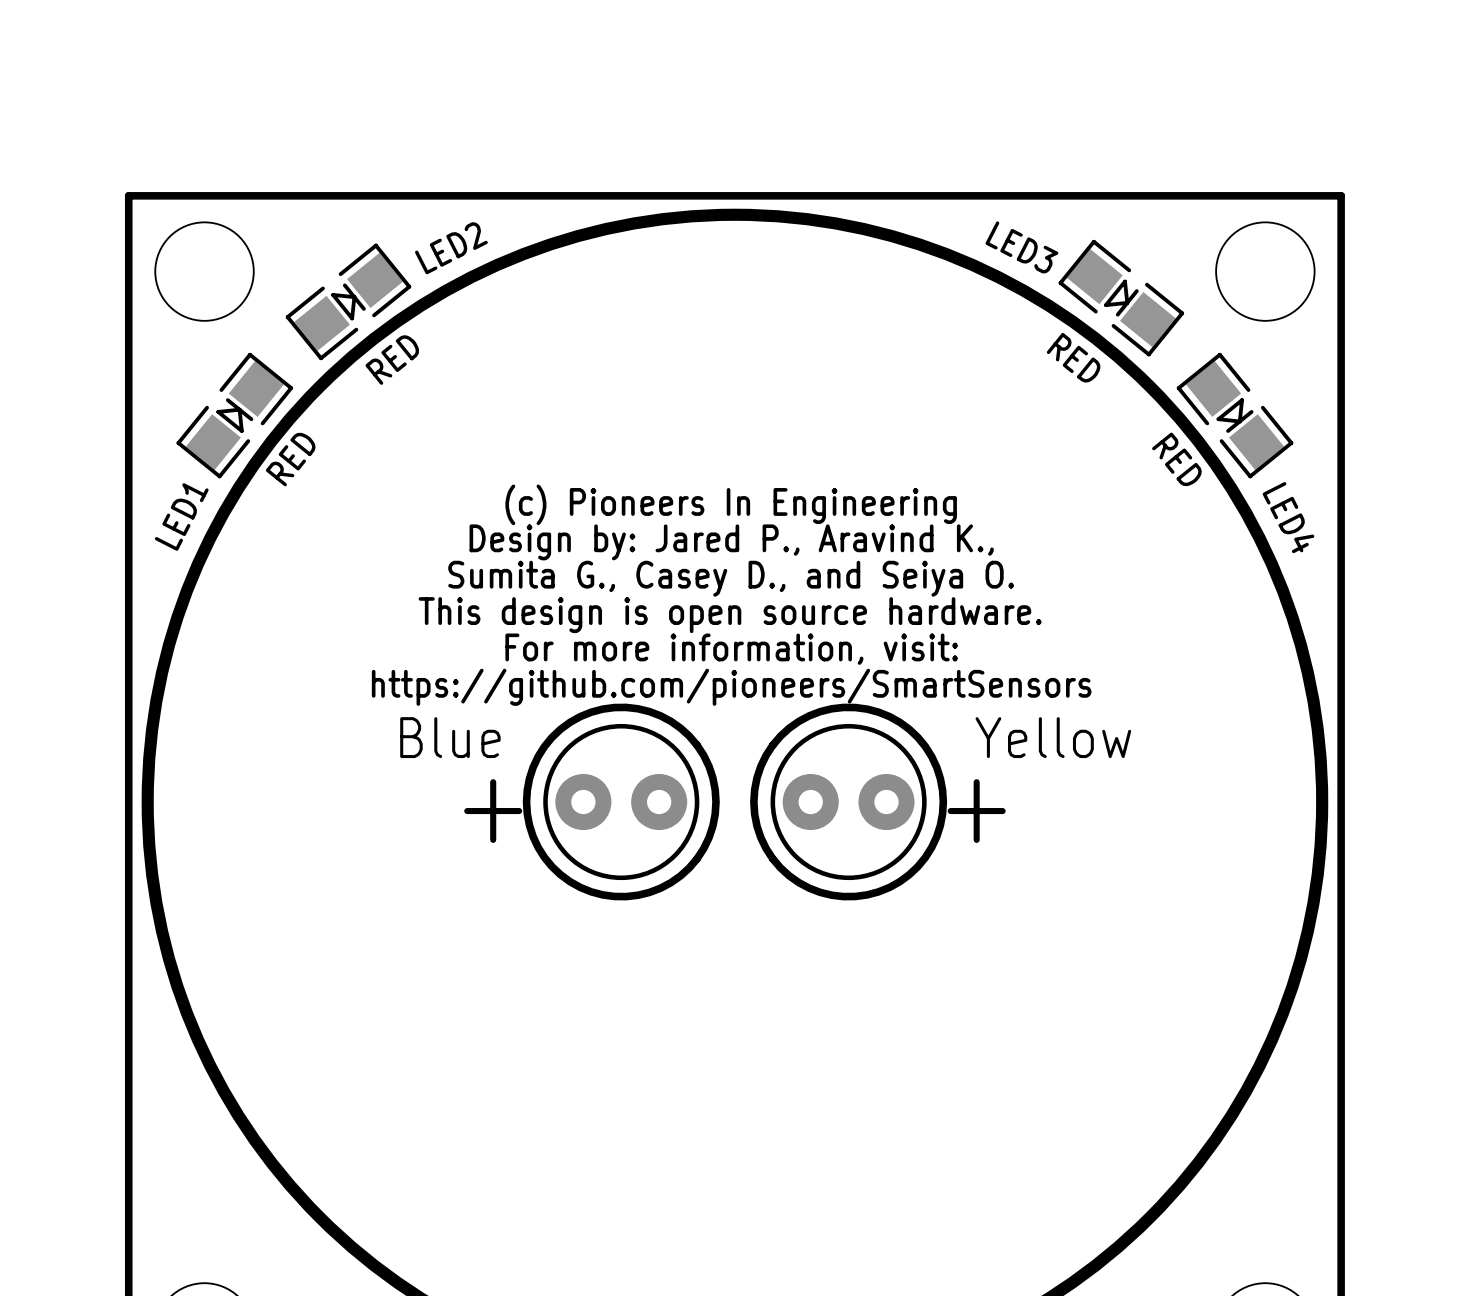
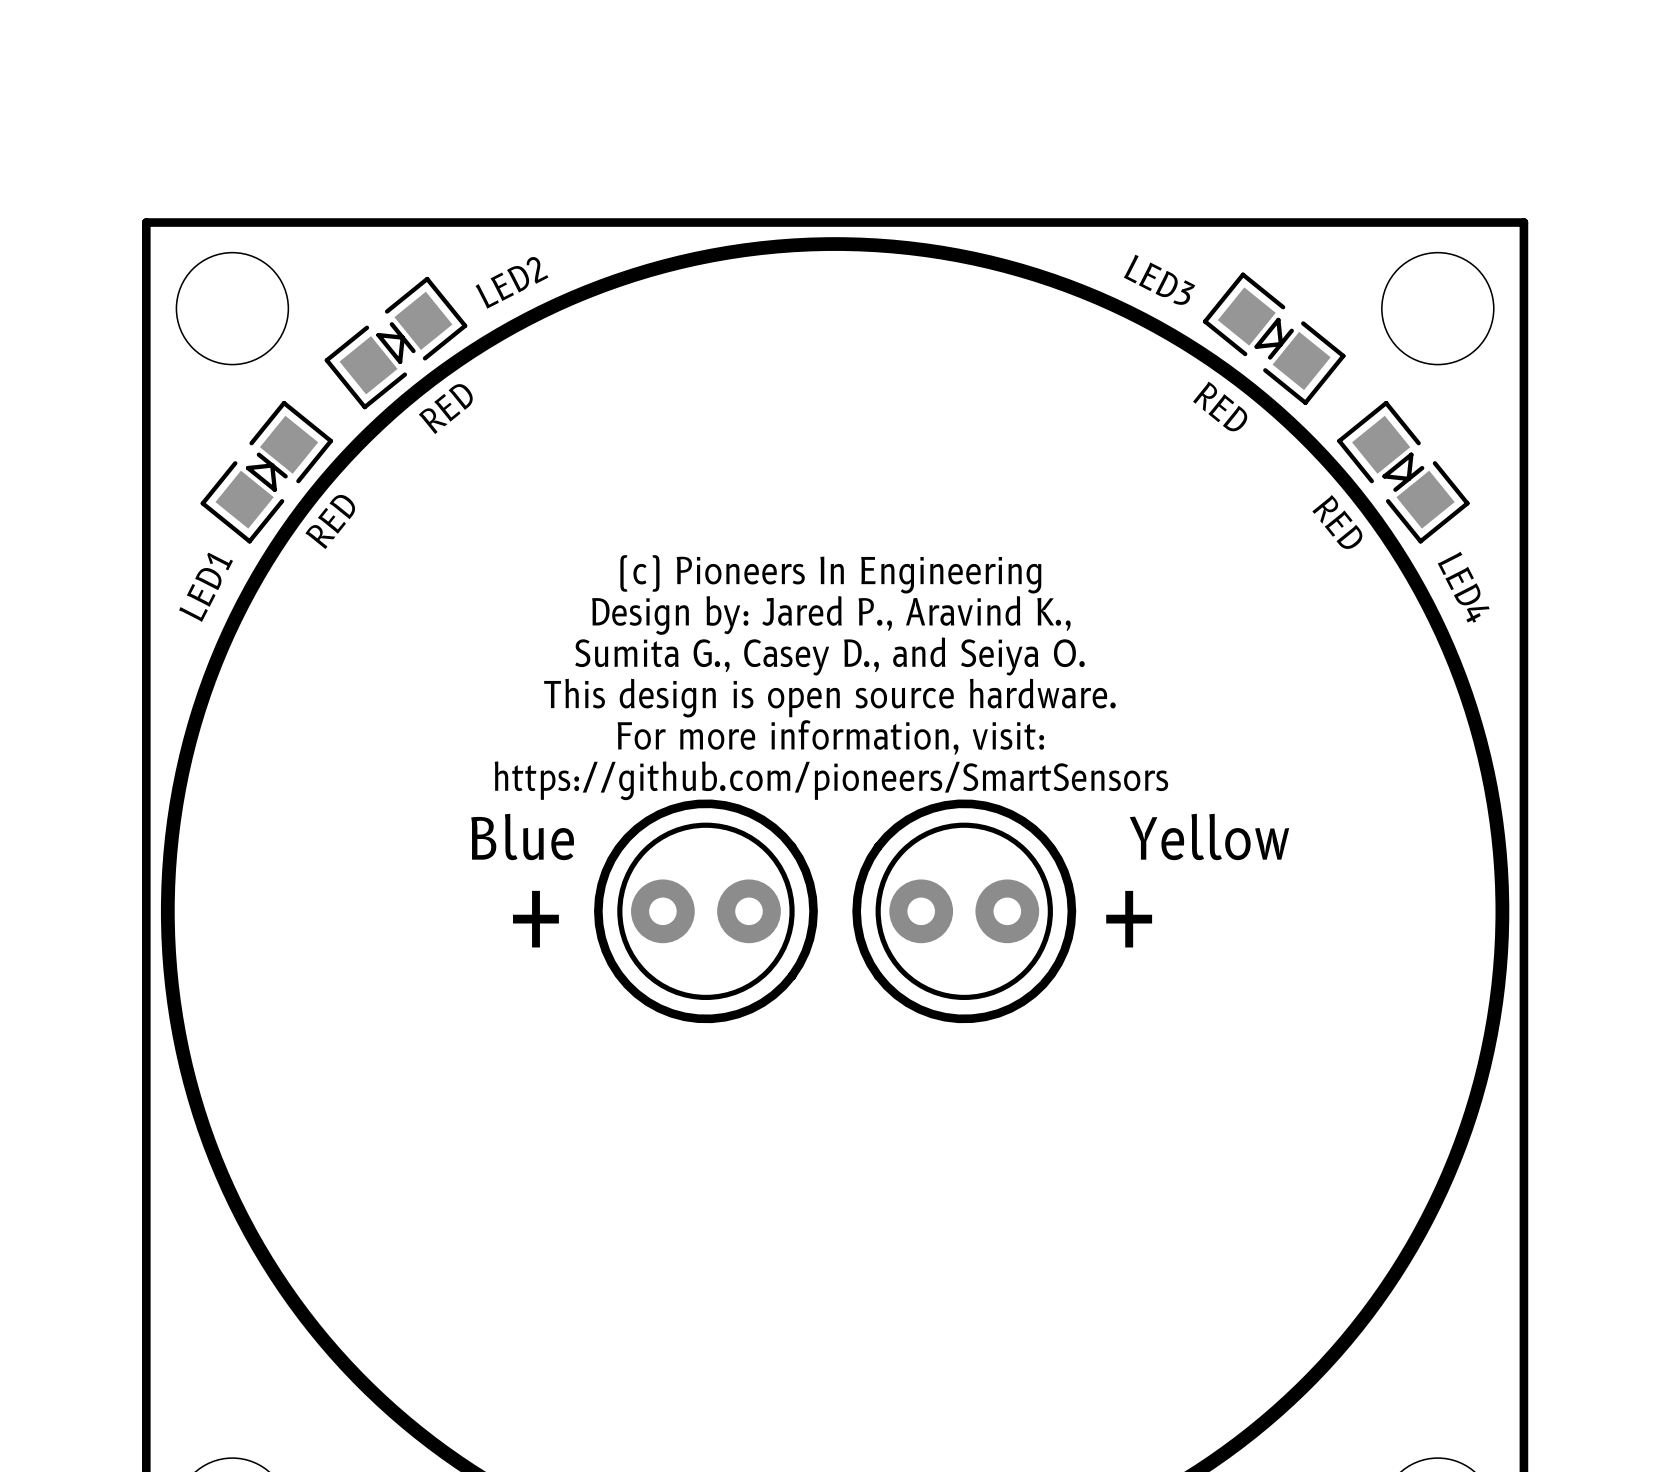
LED3 footprint: [1058, 239, 1185, 357] -> [1202, 272, 1346, 405]
LED2 footprint: [285, 243, 412, 361] -> [324, 276, 468, 410]
LED1 footprint: [176, 352, 294, 479] -> [200, 400, 334, 544]
LED4 footprint: [1176, 352, 1294, 479] -> [1337, 400, 1470, 544]

